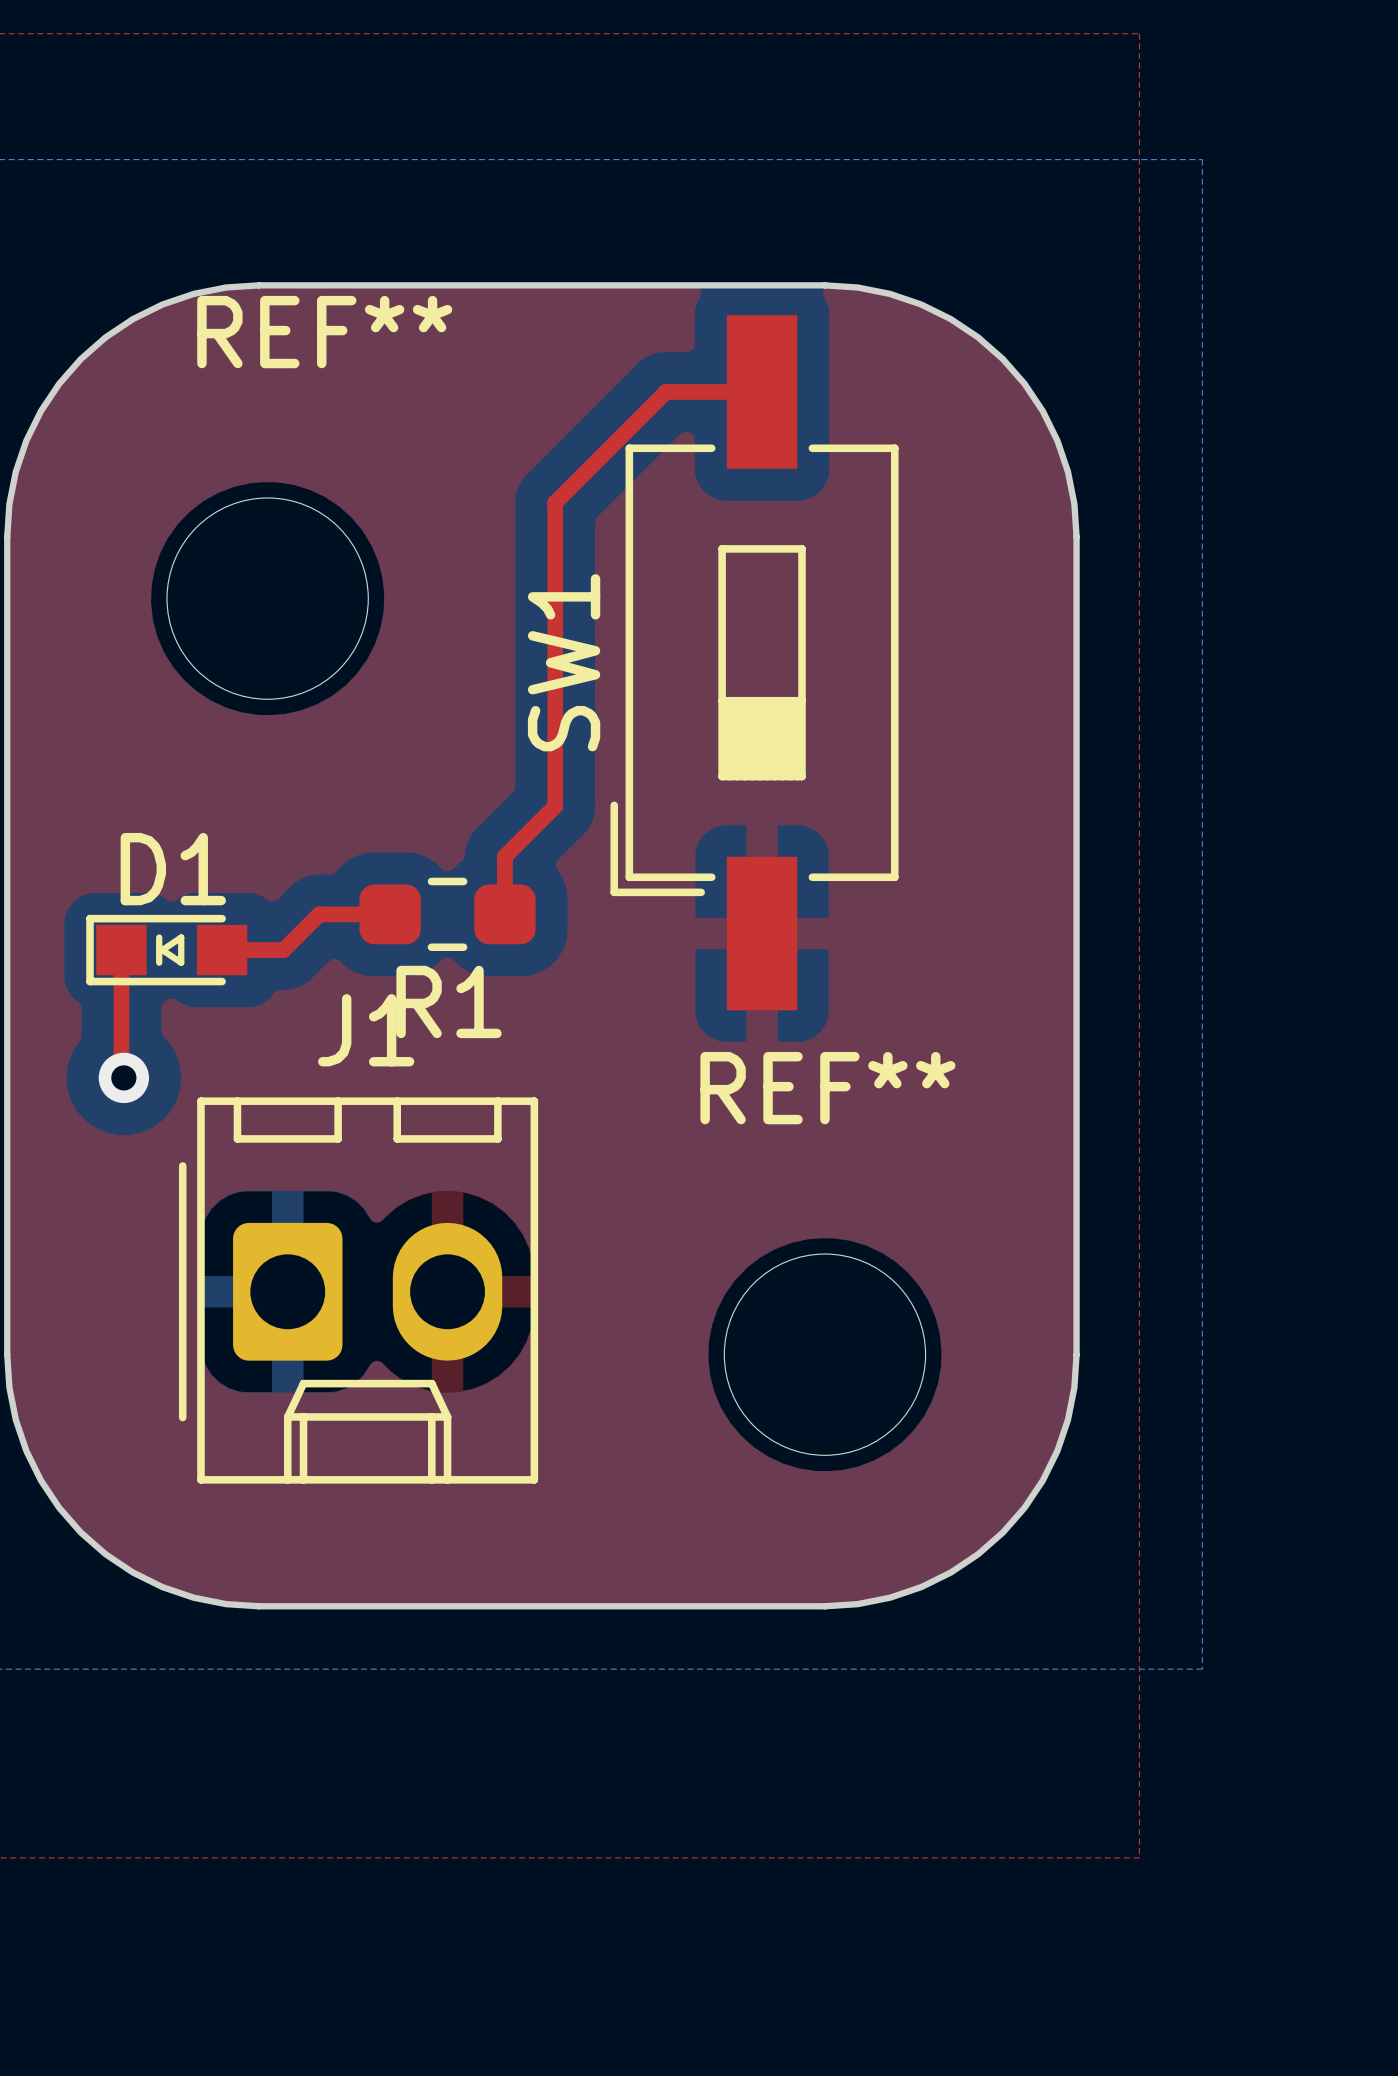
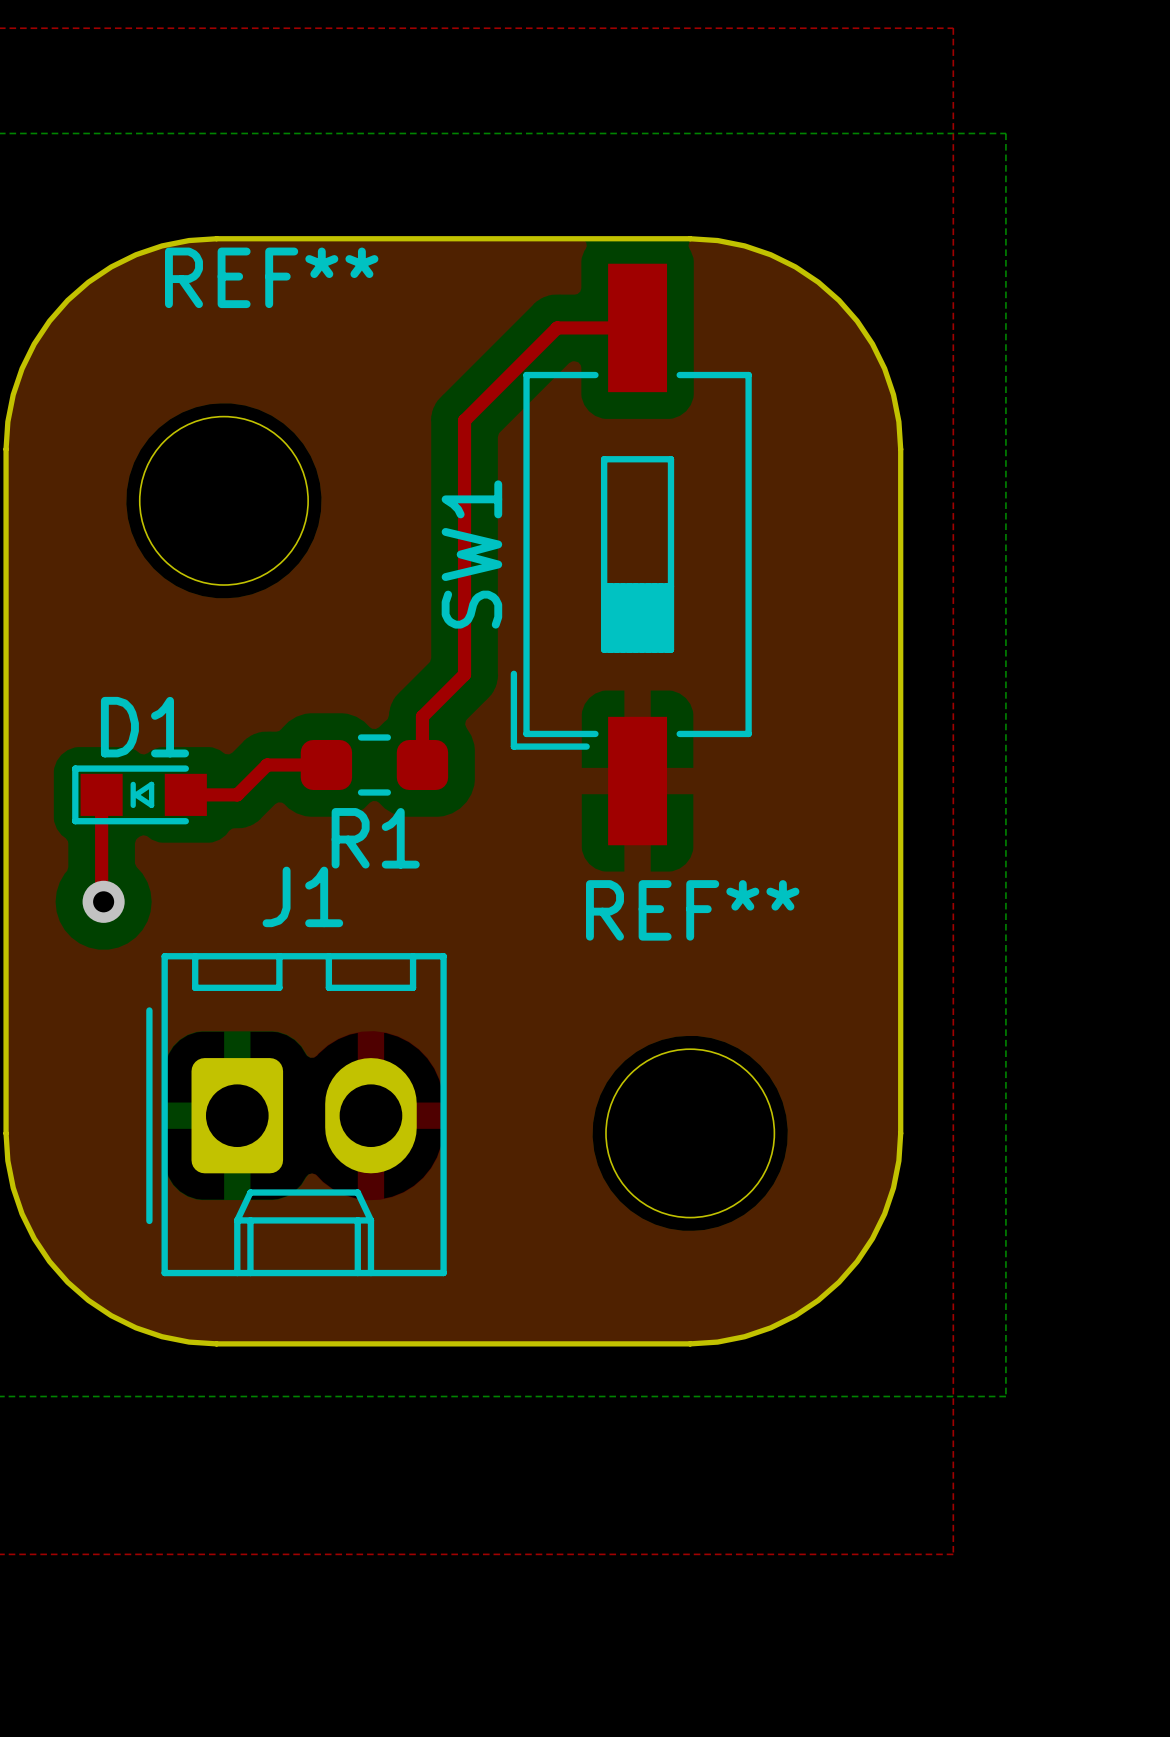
J1 position: (358, 1290) -> (296, 1114)

